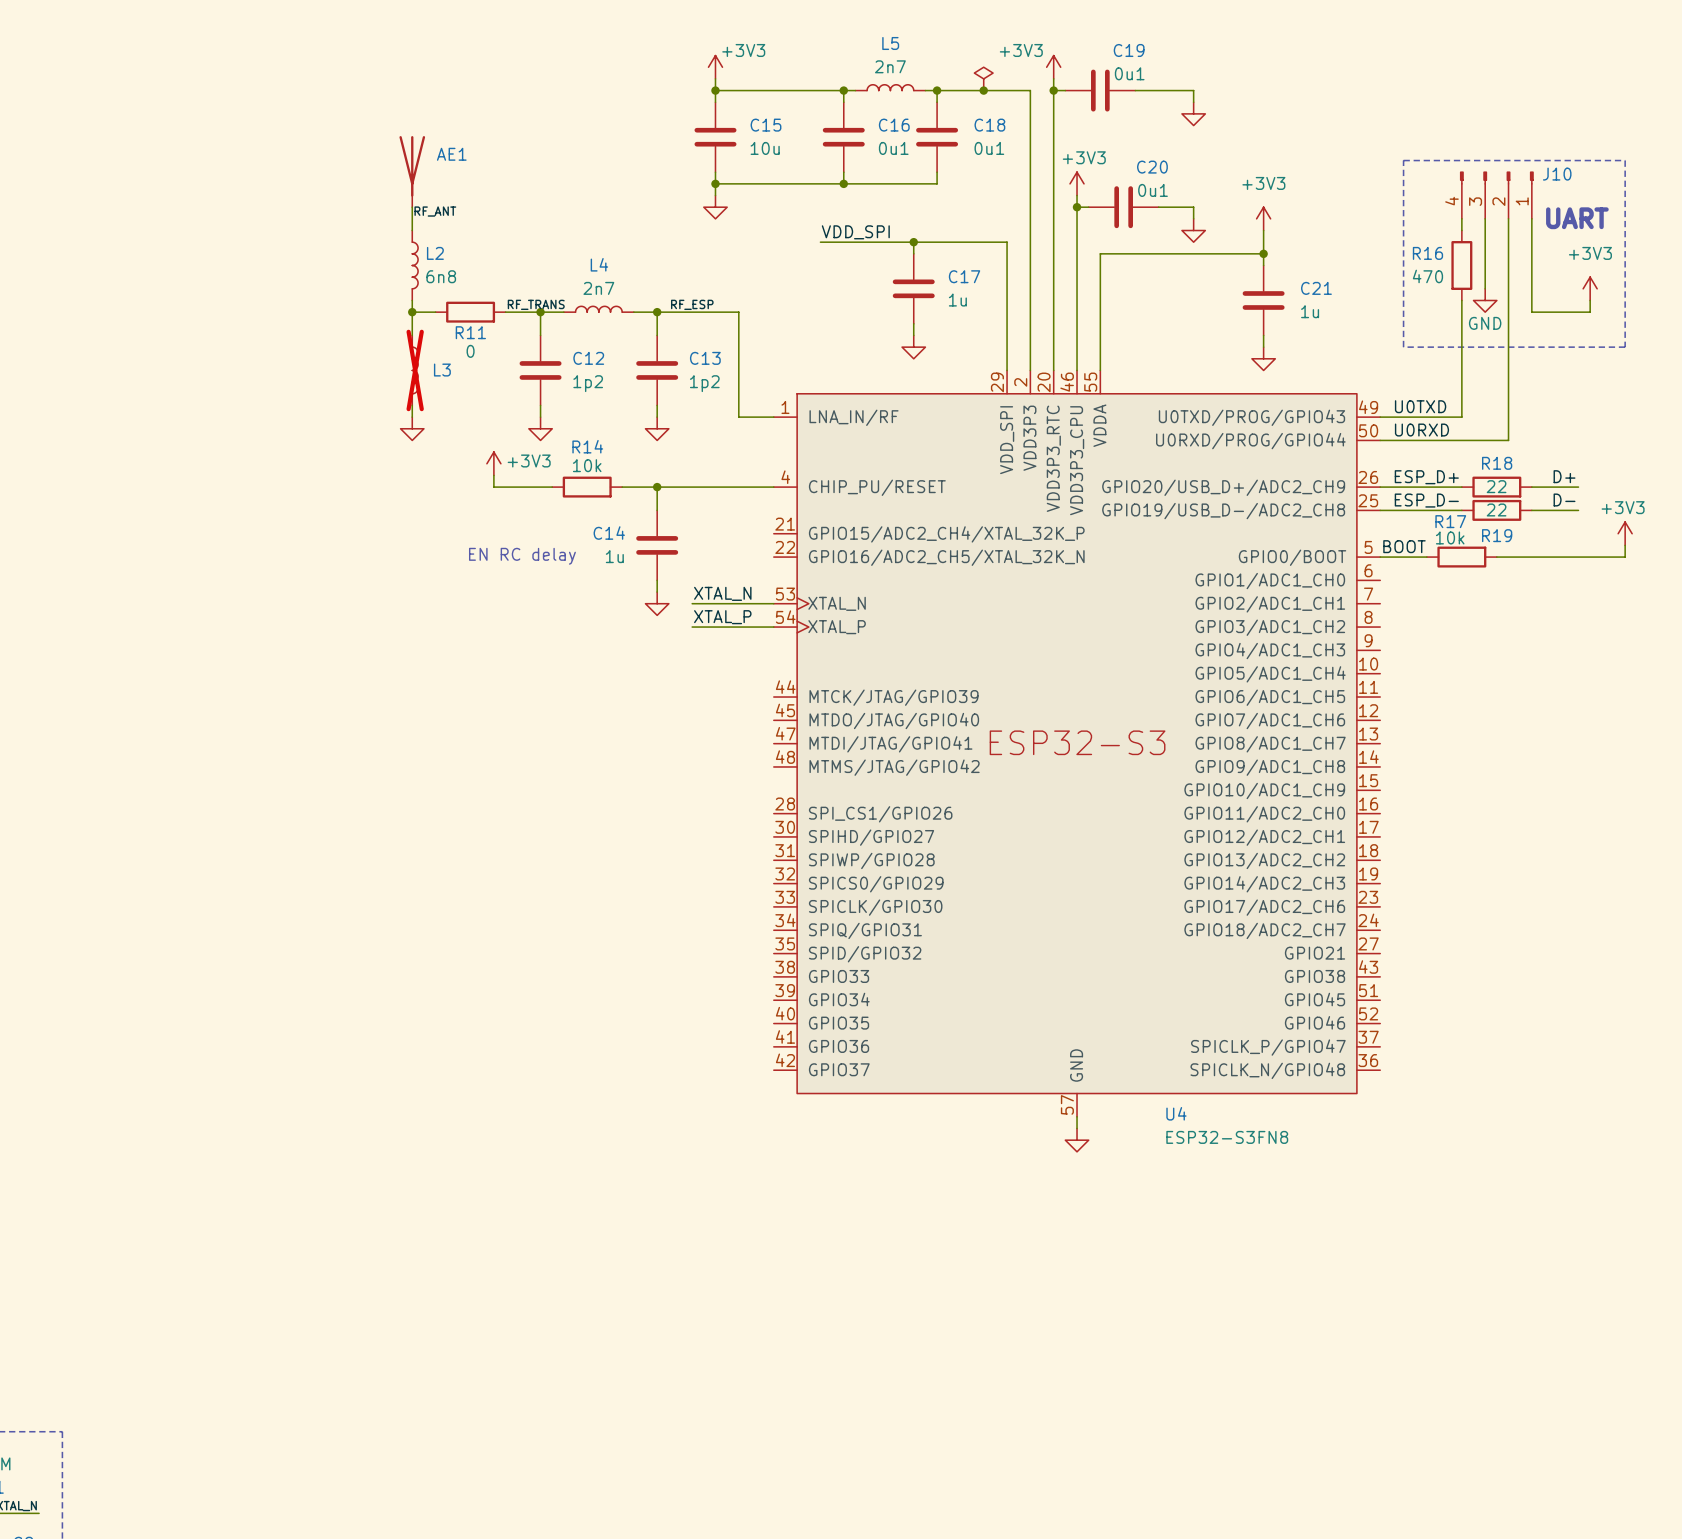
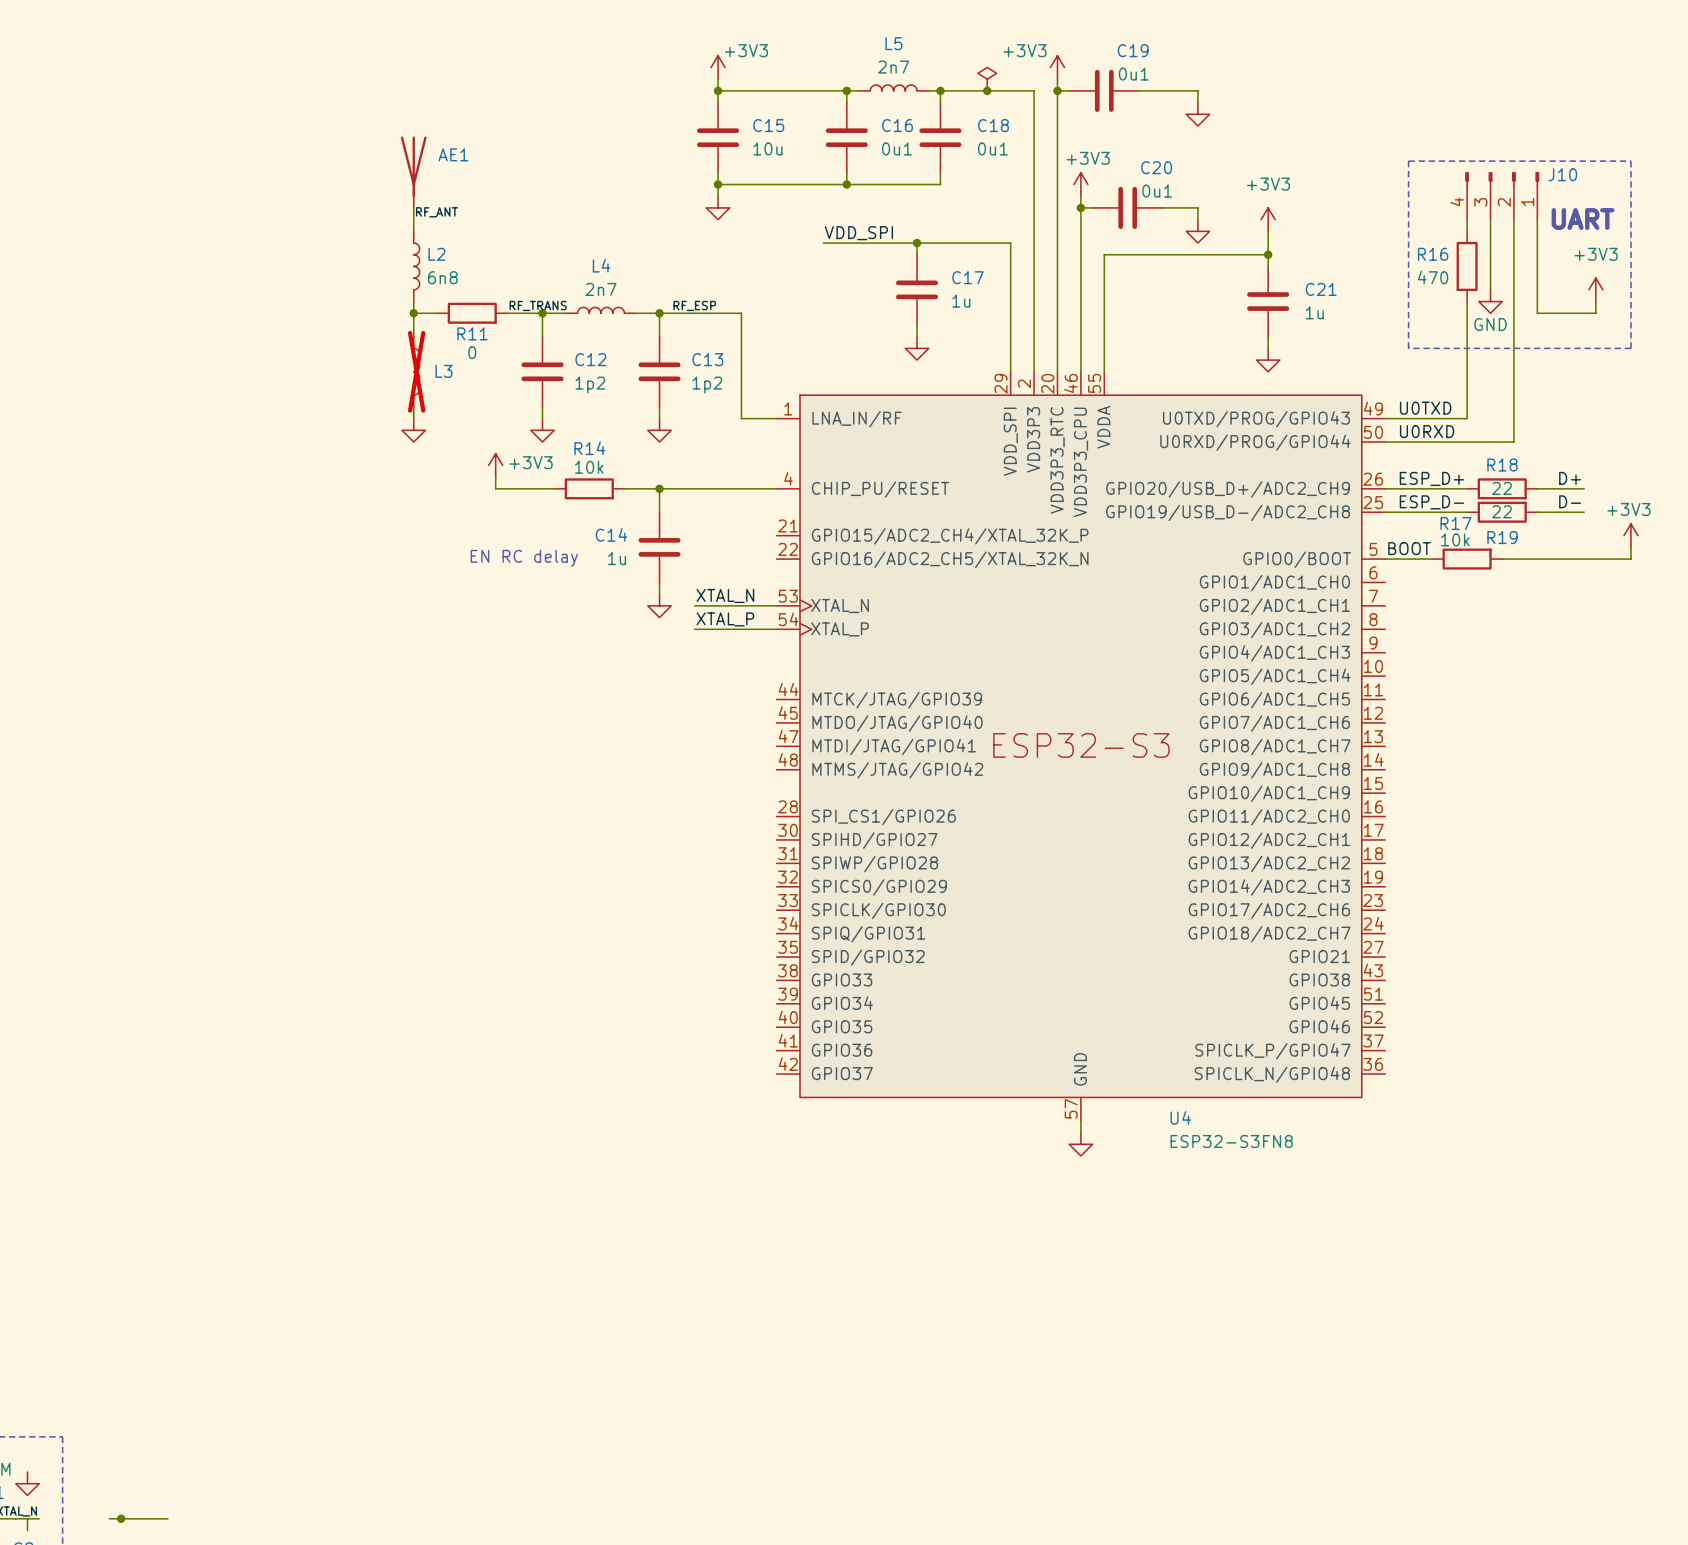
power symbol: none -> (27, 1483)
wire: none -> (27, 1518) (27, 1530)
wire: none -> (109, 1518) (167, 1518)
junction: none -> (121, 1518)

